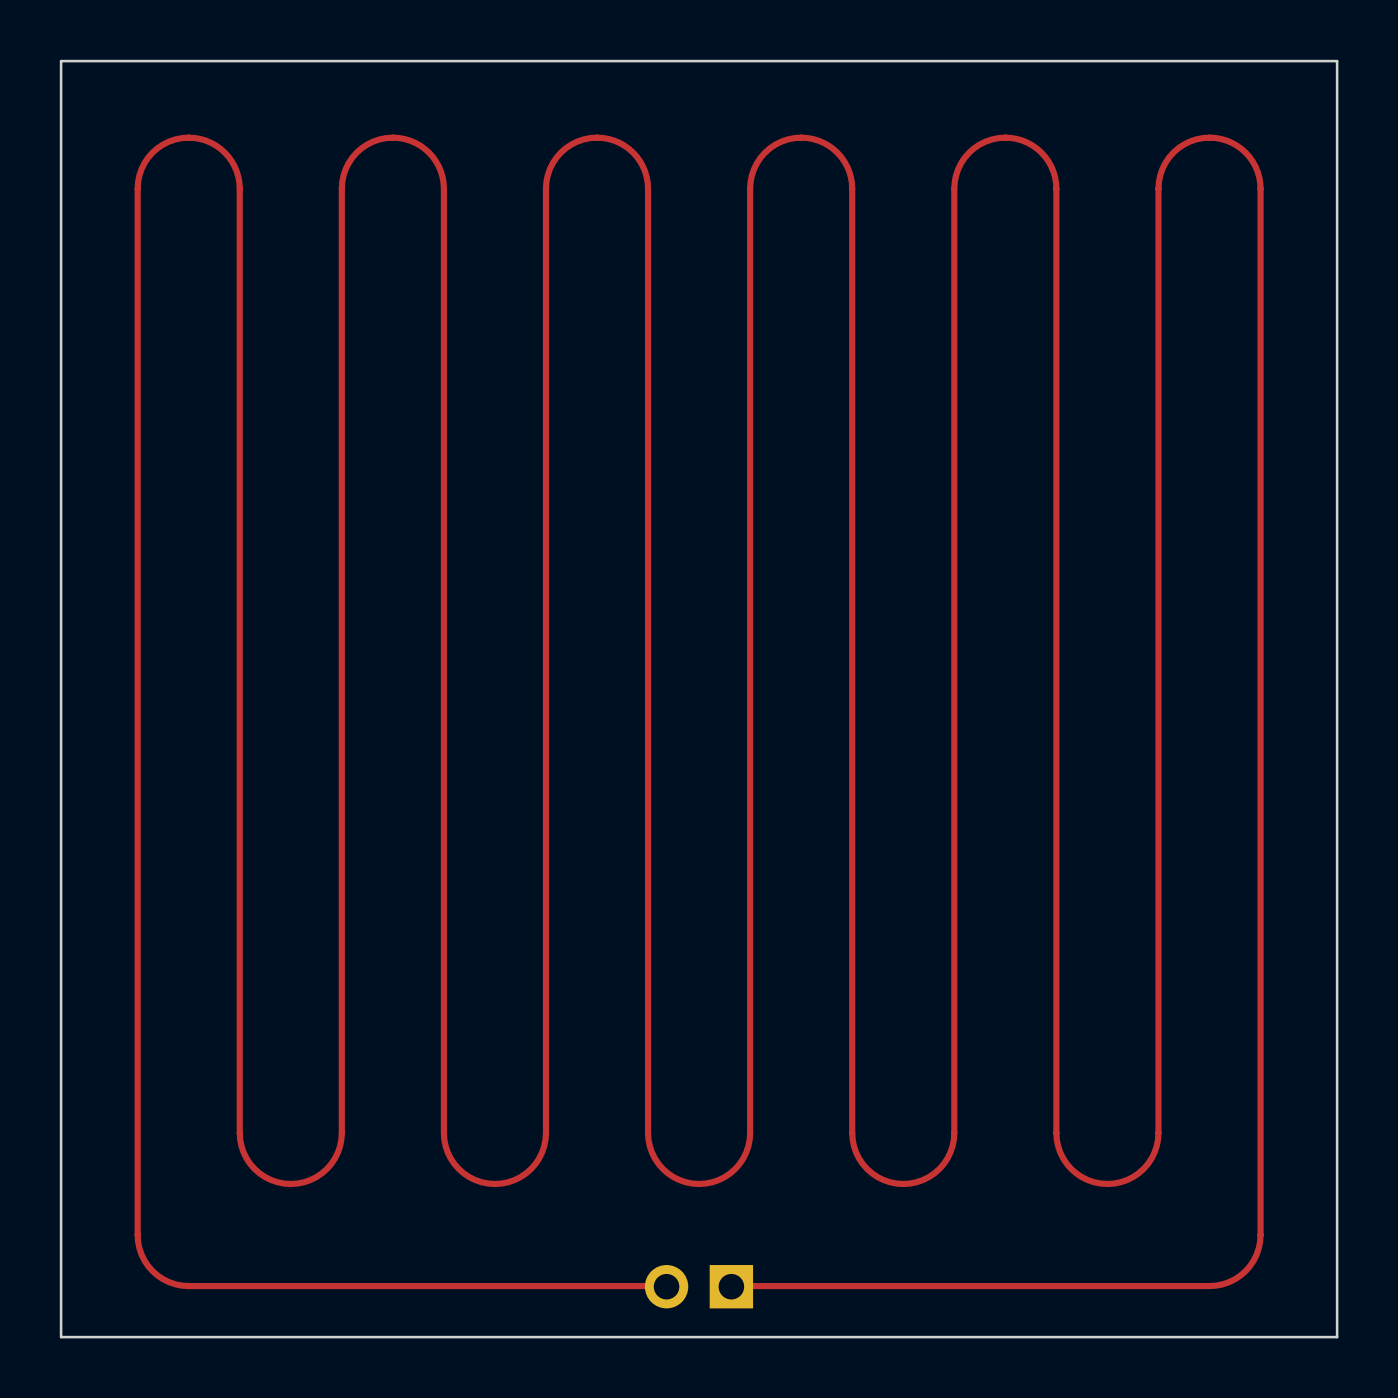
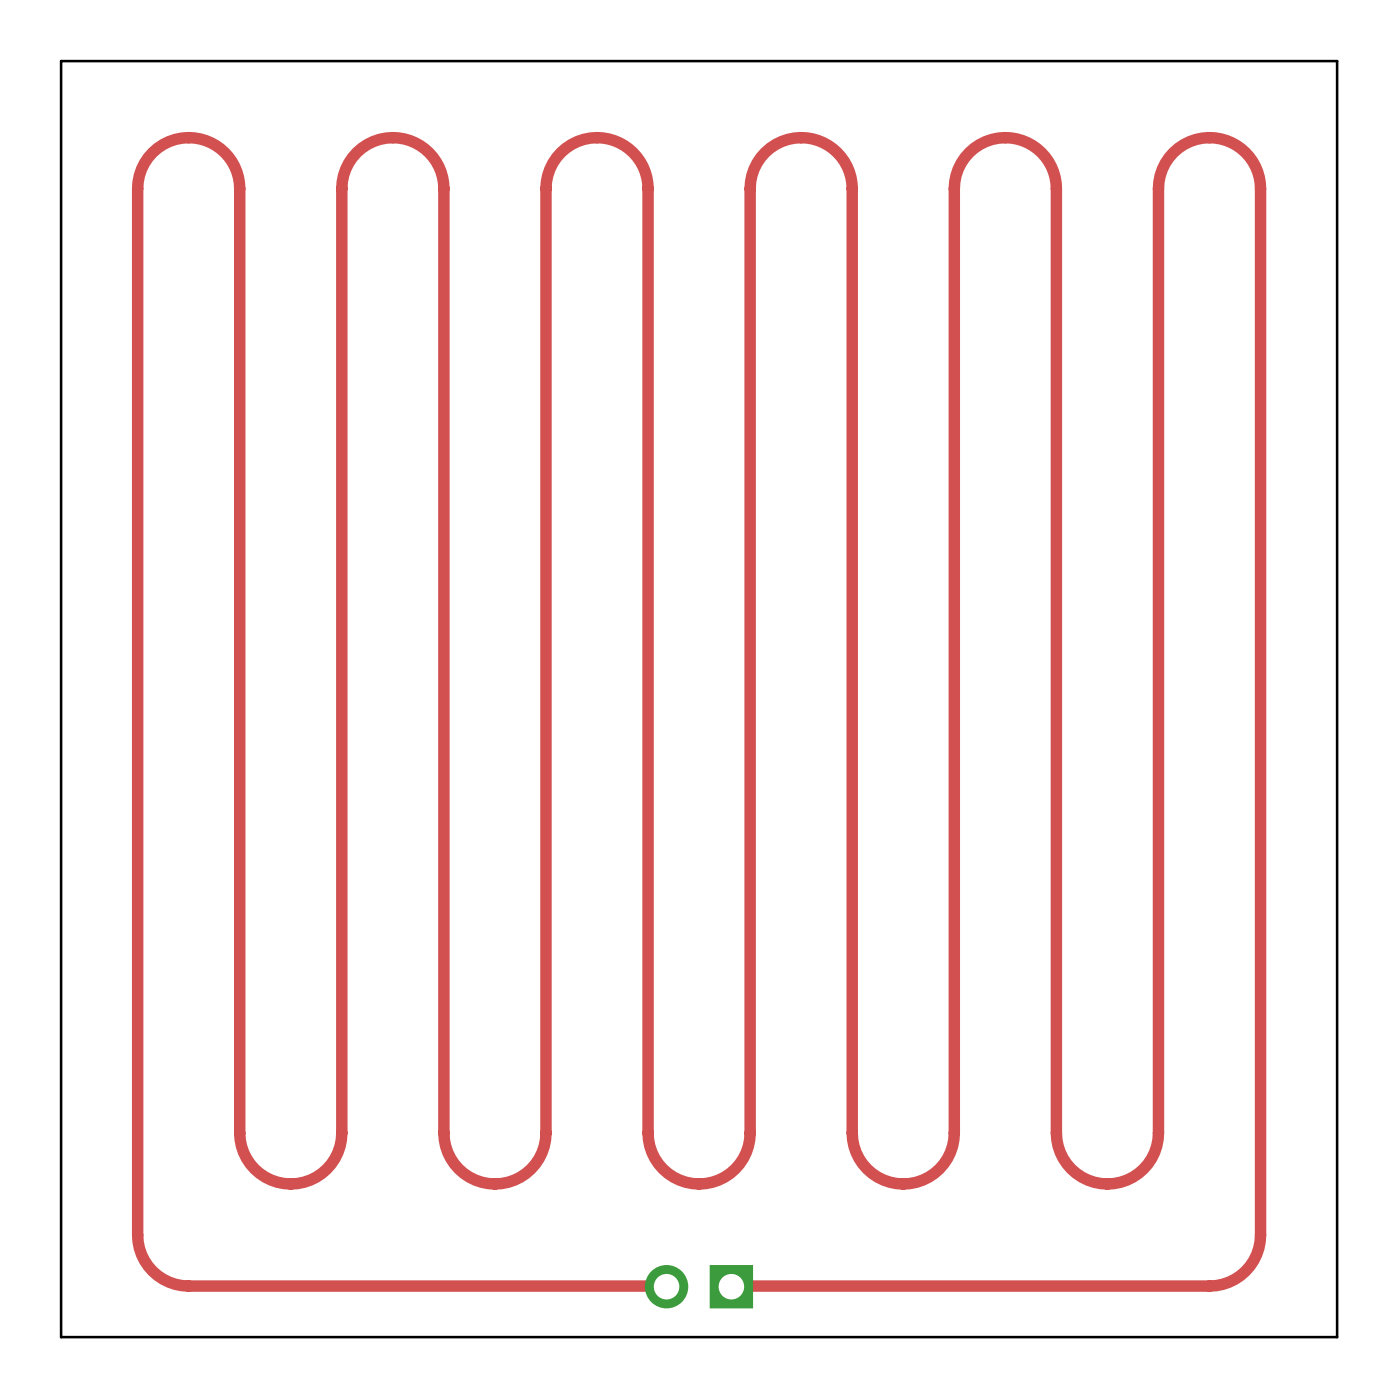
top track width: thin (731, 1286) (1209, 1286) (1229, 1282) (1240, 1275) (1250, 1266) (1256, 1254) (1260, 1235) (1260, 188) (1259, 177) (1252, 161) (1245, 152) (1231, 142) (1209, 137) (1196, 139) (1183, 144) (1169, 157) (1162, 169) (1158, 182) (1158, 1132) (1154, 1152) (1143, 1169) (1126, 1180) (1107, 1183) (1087, 1180) (1071, 1169) (1060, 1152) (1056, 1132) (1056, 188) (1051, 166) (1041, 152) (1027, 142) (1016, 138) (998, 138) (985, 141) (974, 148) (964, 157) (958, 169) (954, 182) (954, 1132) (950, 1152) (939, 1169) (922, 1180) (903, 1183) (883, 1180) (867, 1169) (856, 1152) (852, 1132) (852, 188) (849, 171) (841, 156) (828, 145) (818, 140) (801, 137) (787, 139) (775, 144) (765, 152) (756, 163) (750, 182) (750, 1132) (746, 1152) (735, 1169) (718, 1180) (699, 1183) (679, 1180) (663, 1169) (651, 1152) (648, 1132) (648, 188) (643, 166) (633, 152) (619, 142) (602, 137) (590, 138) (571, 144) (560, 152) (549, 169) (546, 182) (545, 1132) (542, 1152) (531, 1169) (514, 1180) (494, 1183) (475, 1180) (458, 1169) (447, 1152) (443, 1132) (443, 182) (438, 166) (428, 152) (415, 142) (398, 137) (379, 139) (367, 144) (356, 152) (345, 169) (341, 188) (341, 1132) (337, 1152) (326, 1169) (310, 1180) (290, 1183) (271, 1180) (254, 1169) (243, 1152) (239, 1132) (239, 182) (236, 171) (228, 156) (215, 145) (200, 138) (182, 138) (169, 141) (157, 148) (144, 163) (139, 175) (137, 188) (137, 1235) (141, 1254) (148, 1266) (157, 1275) (169, 1282) (188, 1286) (666, 1286) -> thick (731, 1286) (1209, 1286) (1229, 1282) (1240, 1275) (1250, 1266) (1256, 1254) (1260, 1235) (1260, 188) (1259, 177) (1252, 161) (1245, 152) (1231, 142) (1209, 137) (1196, 139) (1183, 144) (1169, 157) (1162, 169) (1158, 182) (1158, 1132) (1154, 1152) (1143, 1169) (1126, 1180) (1107, 1183) (1087, 1180) (1071, 1169) (1060, 1152) (1056, 1132) (1056, 188) (1051, 166) (1041, 152) (1027, 142) (1016, 138) (998, 138) (985, 141) (974, 148) (964, 157) (958, 169) (954, 182) (954, 1132) (950, 1152) (939, 1169) (922, 1180) (903, 1183) (883, 1180) (867, 1169) (856, 1152) (852, 1132) (852, 188) (849, 171) (841, 156) (828, 145) (818, 140) (801, 137) (787, 139) (775, 144) (765, 152) (756, 163) (750, 182) (750, 1132) (746, 1152) (735, 1169) (718, 1180) (699, 1183) (679, 1180) (663, 1169) (651, 1152) (648, 1132) (648, 188) (643, 166) (633, 152) (619, 142) (602, 137) (590, 138) (571, 144) (560, 152) (549, 169) (546, 182) (545, 1132) (542, 1152) (531, 1169) (514, 1180) (494, 1183) (475, 1180) (458, 1169) (447, 1152) (443, 1132) (443, 182) (438, 166) (428, 152) (415, 142) (398, 137) (379, 139) (367, 144) (356, 152) (345, 169) (341, 188) (341, 1132) (337, 1152) (326, 1169) (310, 1180) (290, 1183) (271, 1180) (254, 1169) (243, 1152) (239, 1132) (239, 182) (236, 171) (228, 156) (215, 145) (200, 138) (182, 138) (169, 141) (157, 148) (144, 163) (139, 175) (137, 188) (137, 1235) (141, 1254) (148, 1266) (157, 1275) (169, 1282) (188, 1286) (666, 1286)

